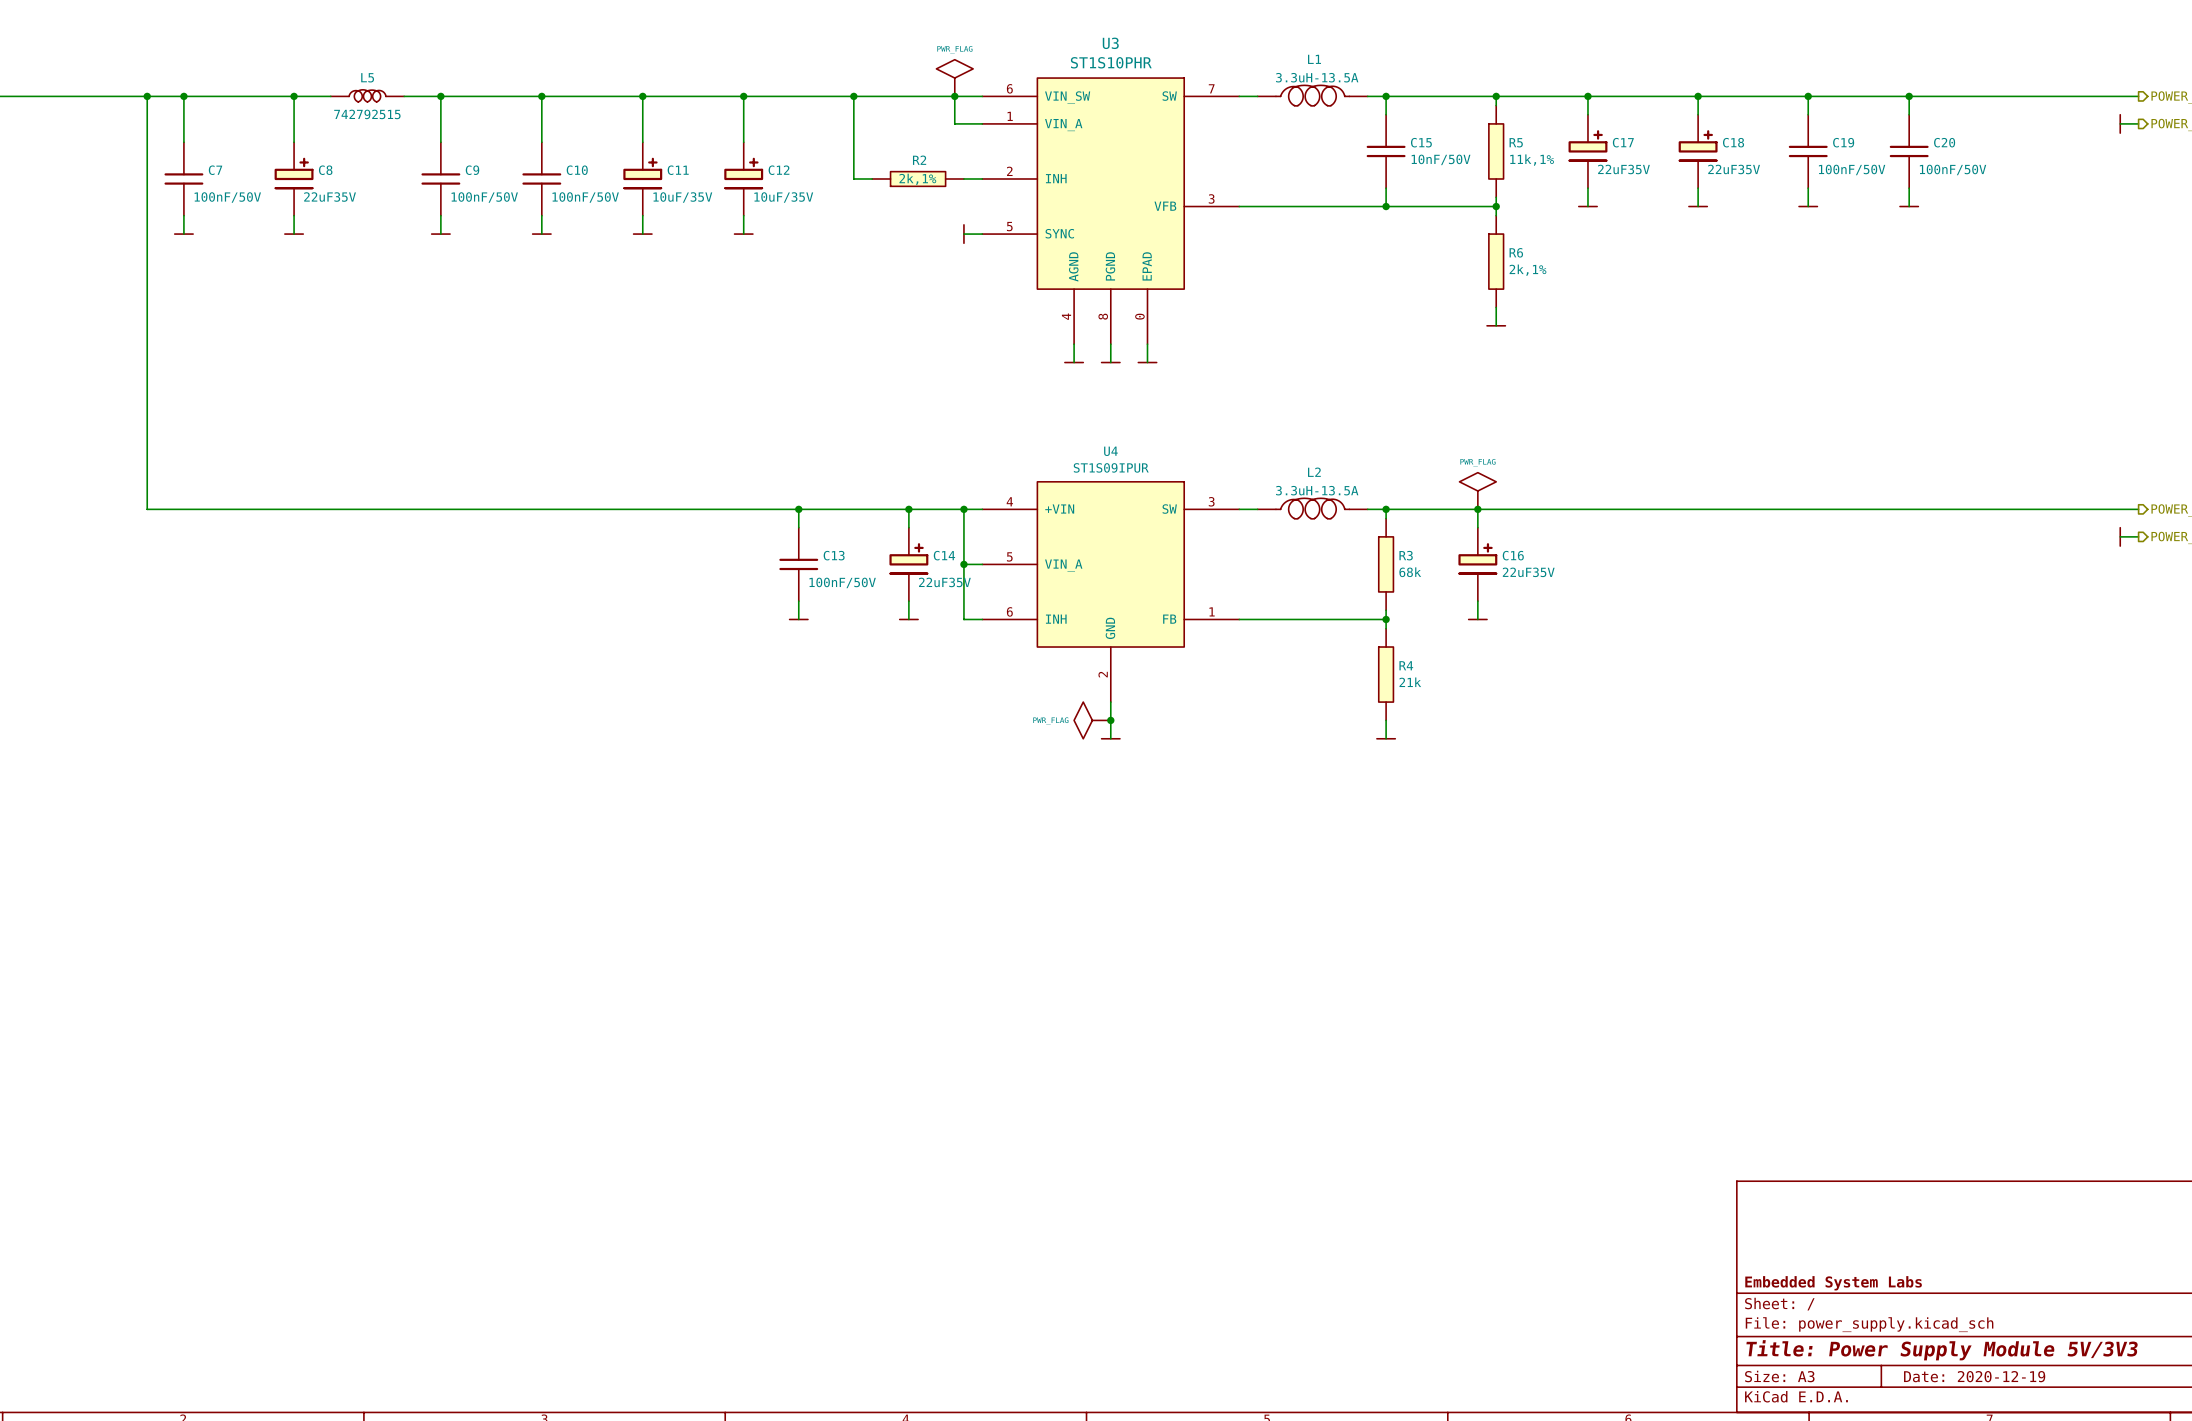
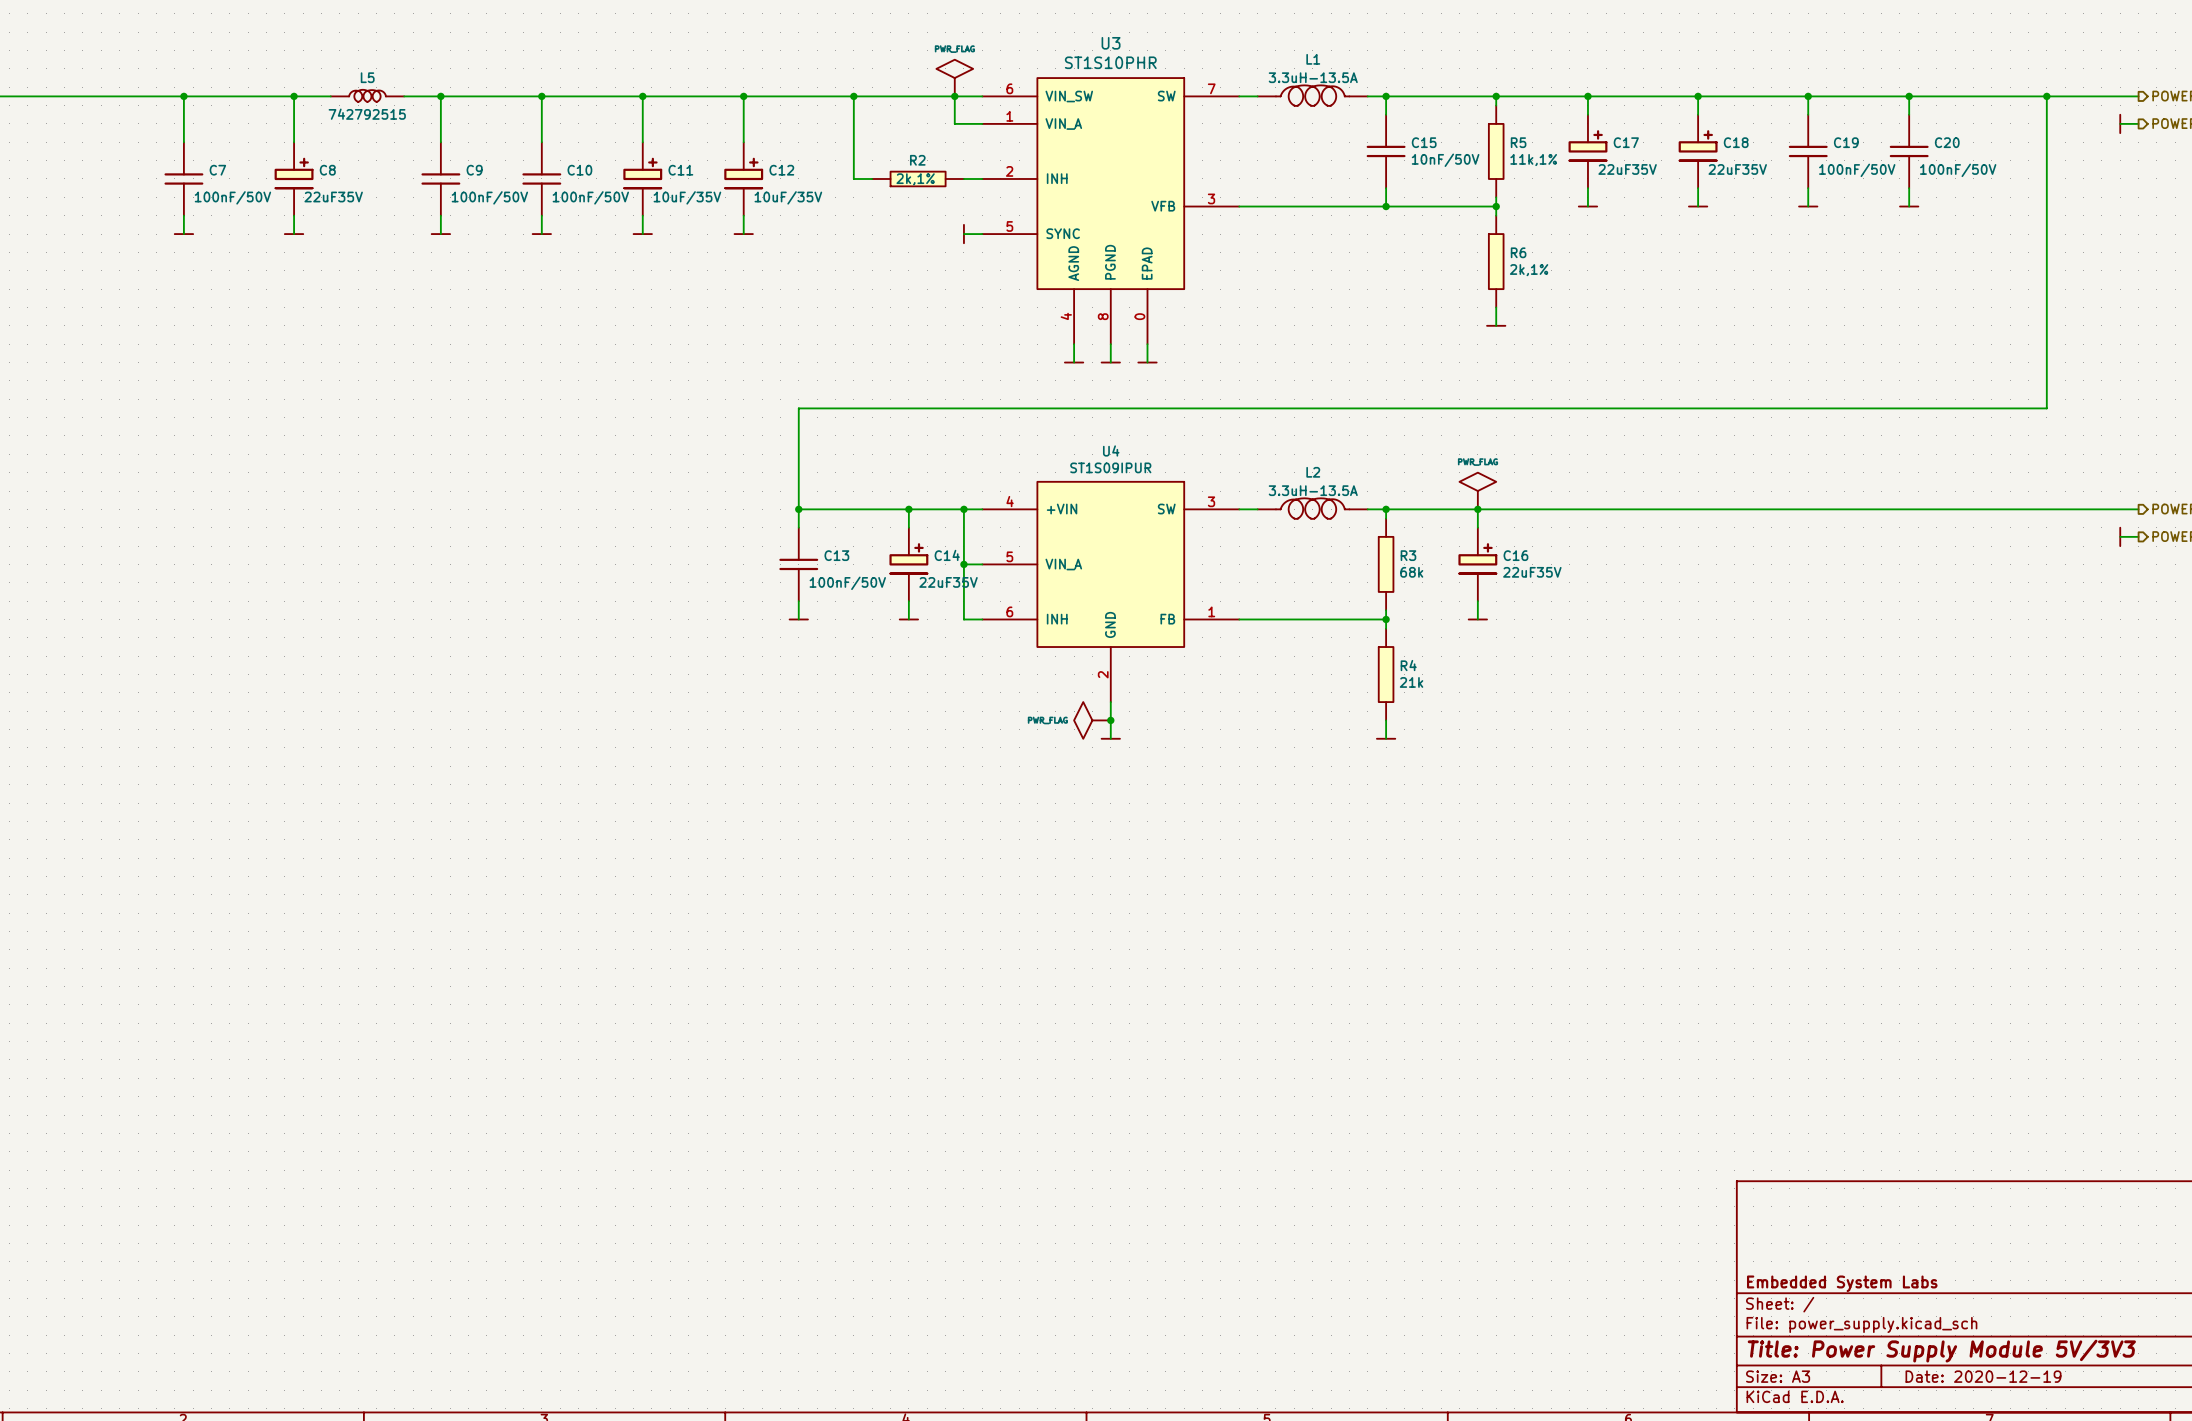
wire: (147, 96) (147, 509) (798, 509) -> (2046, 96) (2046, 408) (798, 408) (798, 509)
junction: (147, 96) -> none
junction: none -> (2046, 96)

